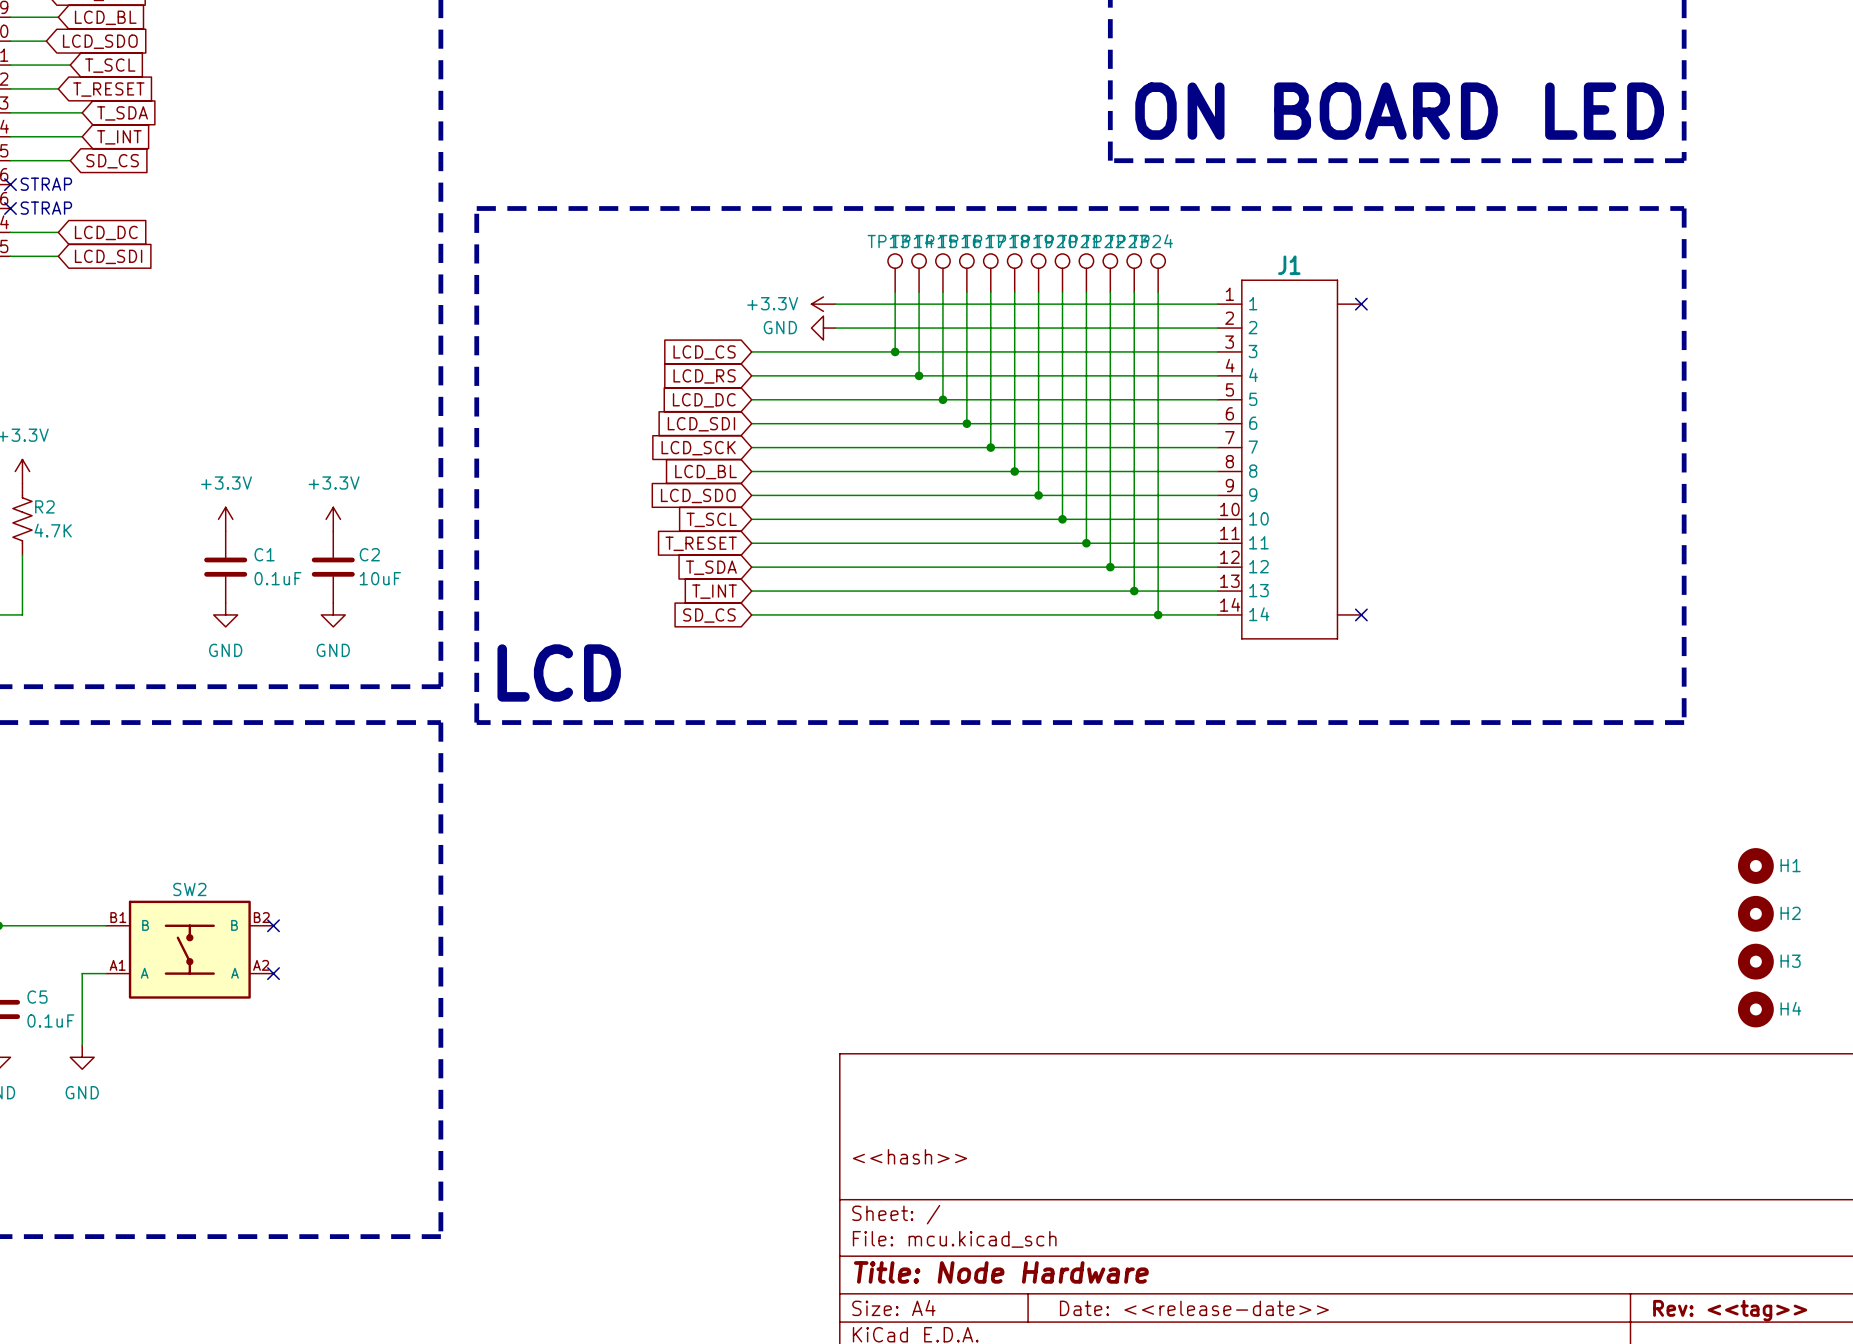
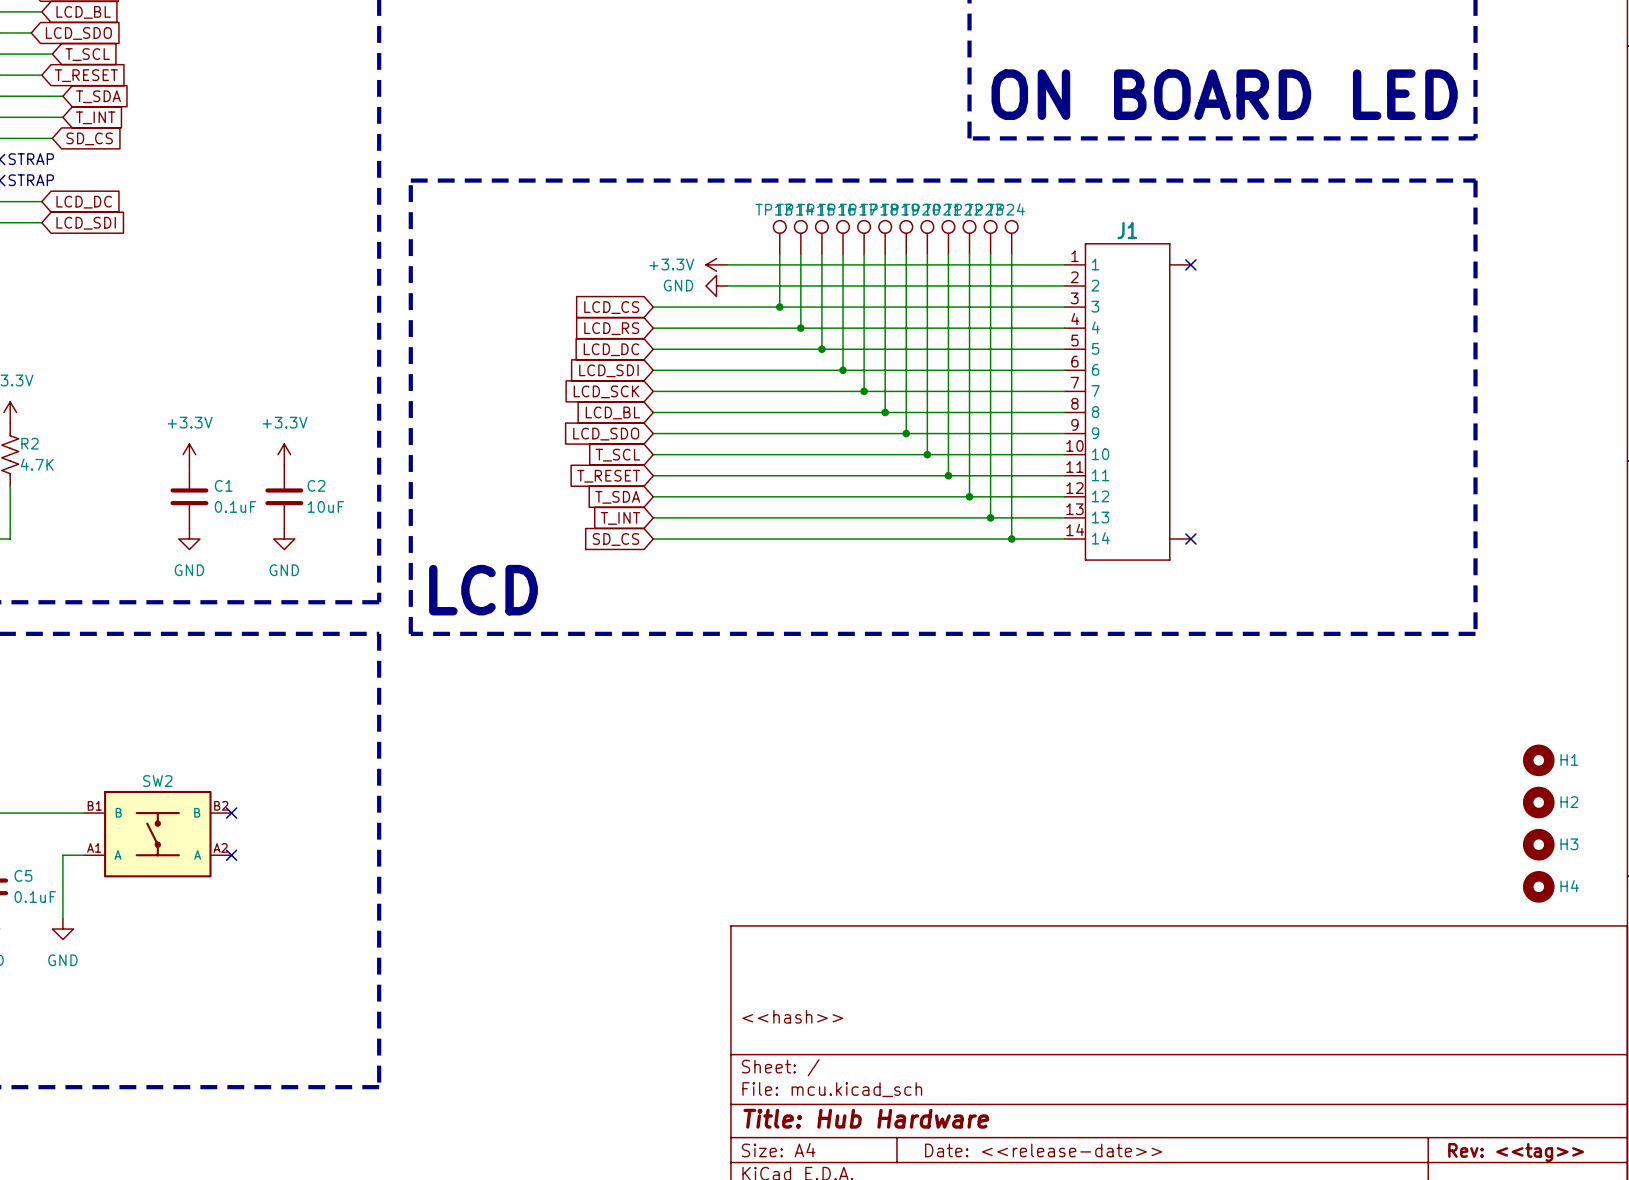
title block: Title: Node Hardware (1001, 1272) -> Title: Hub Hardware (866, 1118)

